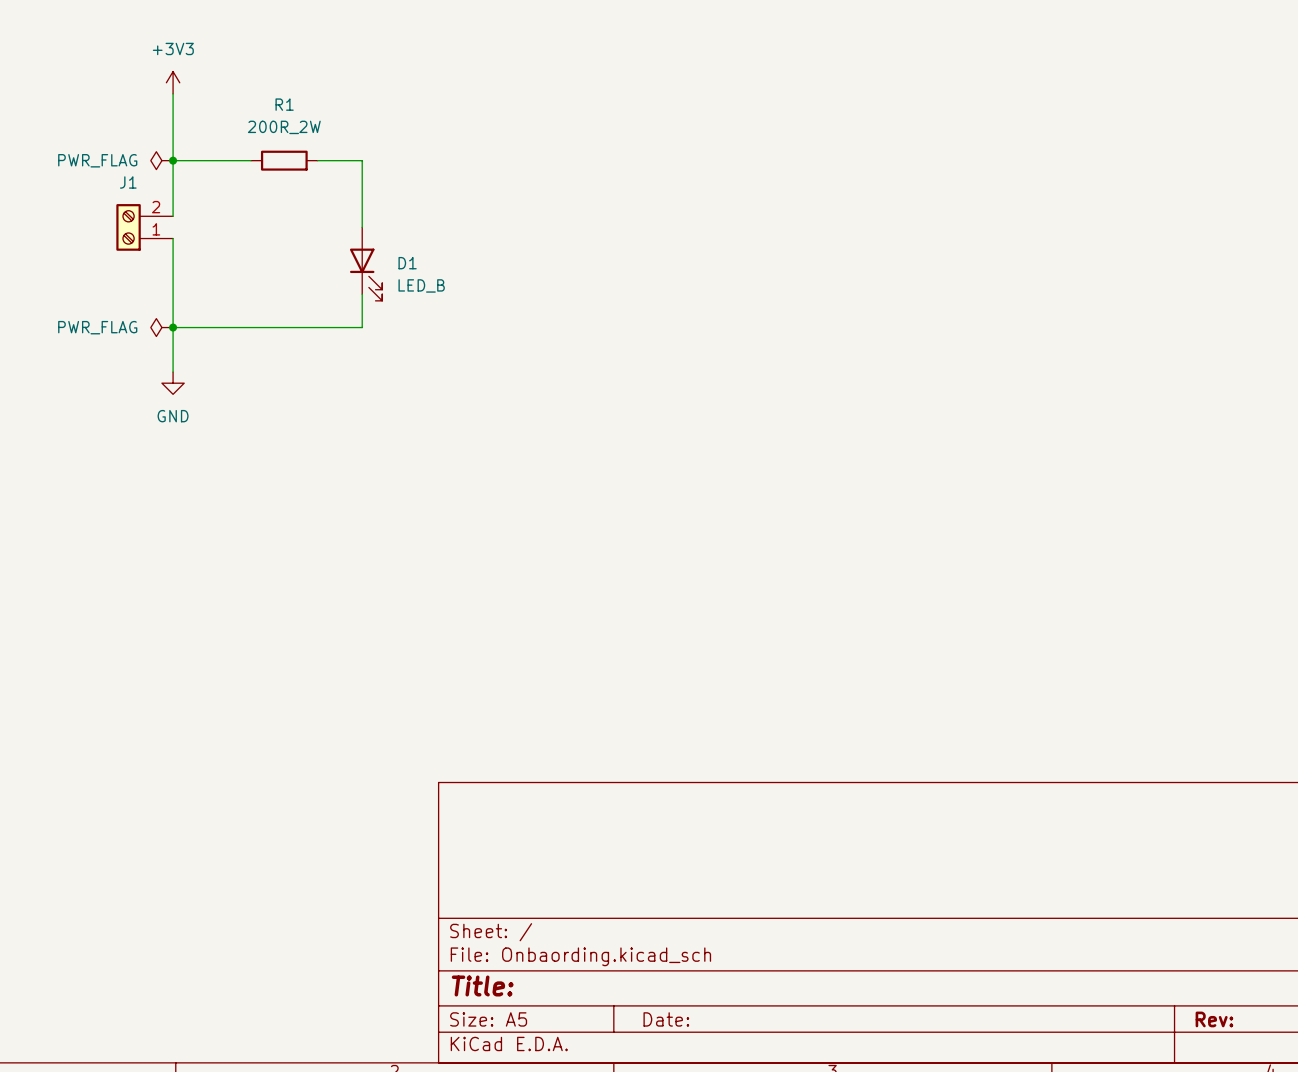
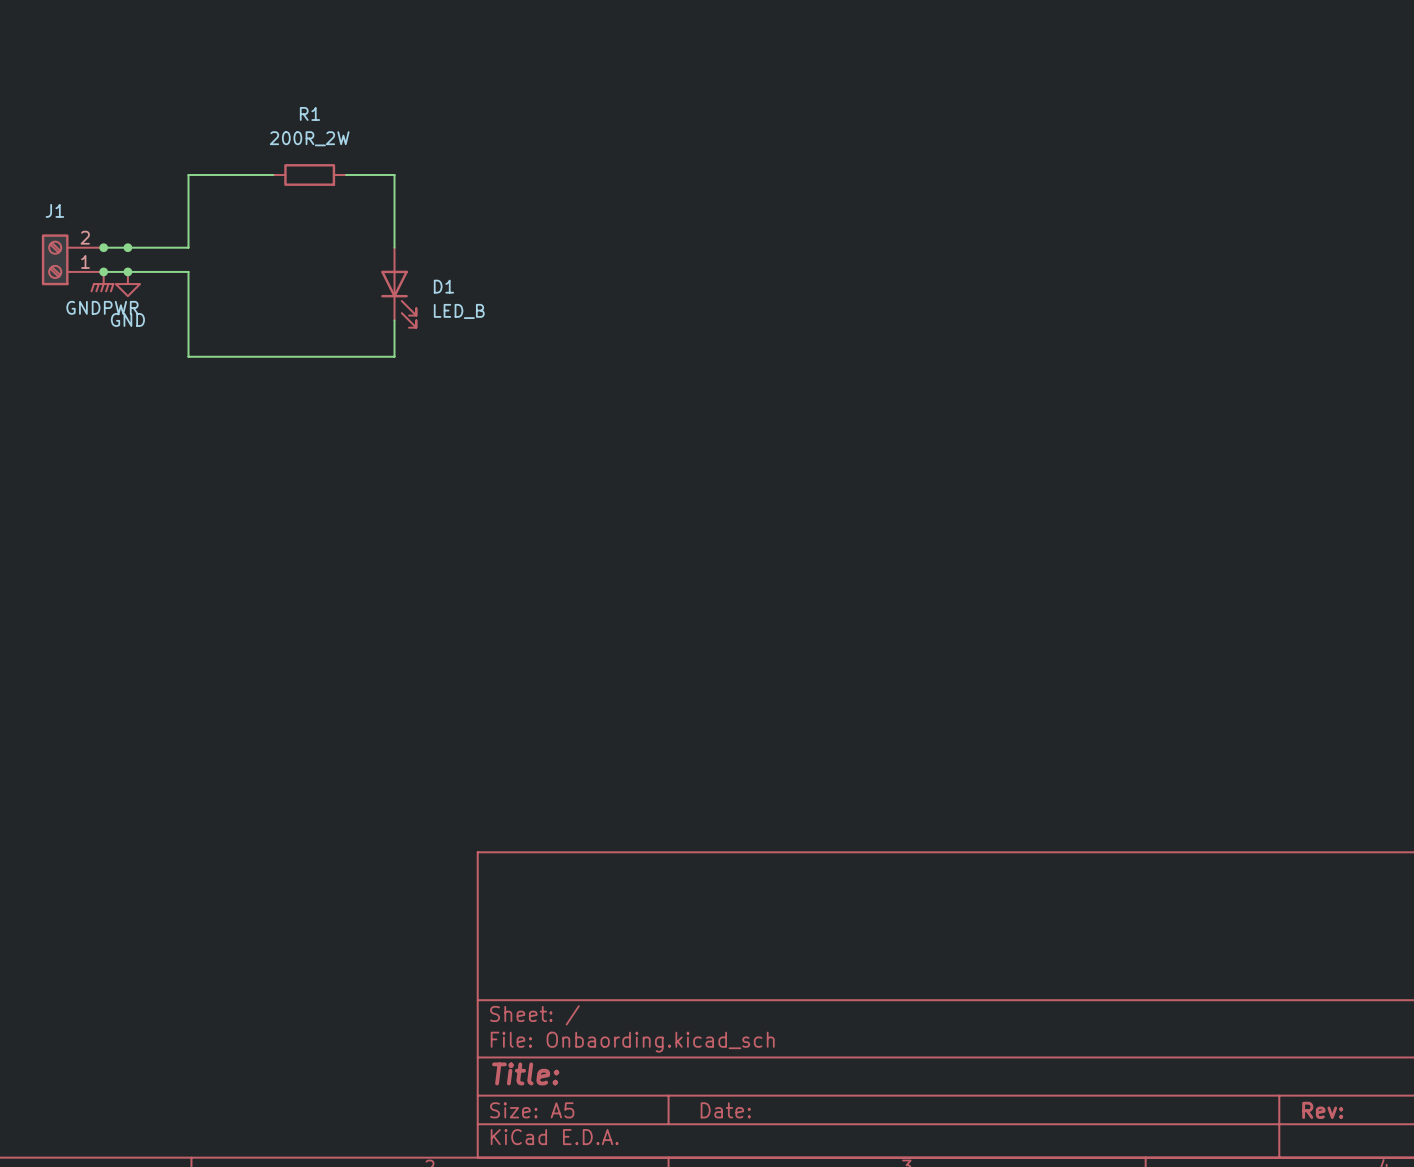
power symbol: +3V3 (173, 82) -> none
wire: (173, 93) (173, 160) -> none
power symbol: PWR_FLAG (161, 160) -> none
junction: (173, 160) -> none
wire: none -> (188, 235) (188, 247) (103, 247)
junction: none -> (103, 247)
junction: none -> (127, 247)
J1 position: (144, 227) -> (72, 259)
wire: (173, 238) (173, 249) -> (103, 271) (188, 271)
junction: none -> (103, 271)
junction: none -> (127, 271)
power symbol: none -> GNDPWR (102, 282)
power symbol: PWR_FLAG (161, 327) -> none
wire: (173, 327) (173, 372) -> none
junction: (173, 327) -> none
power symbol position: GND (173, 383) -> GND (127, 284)

